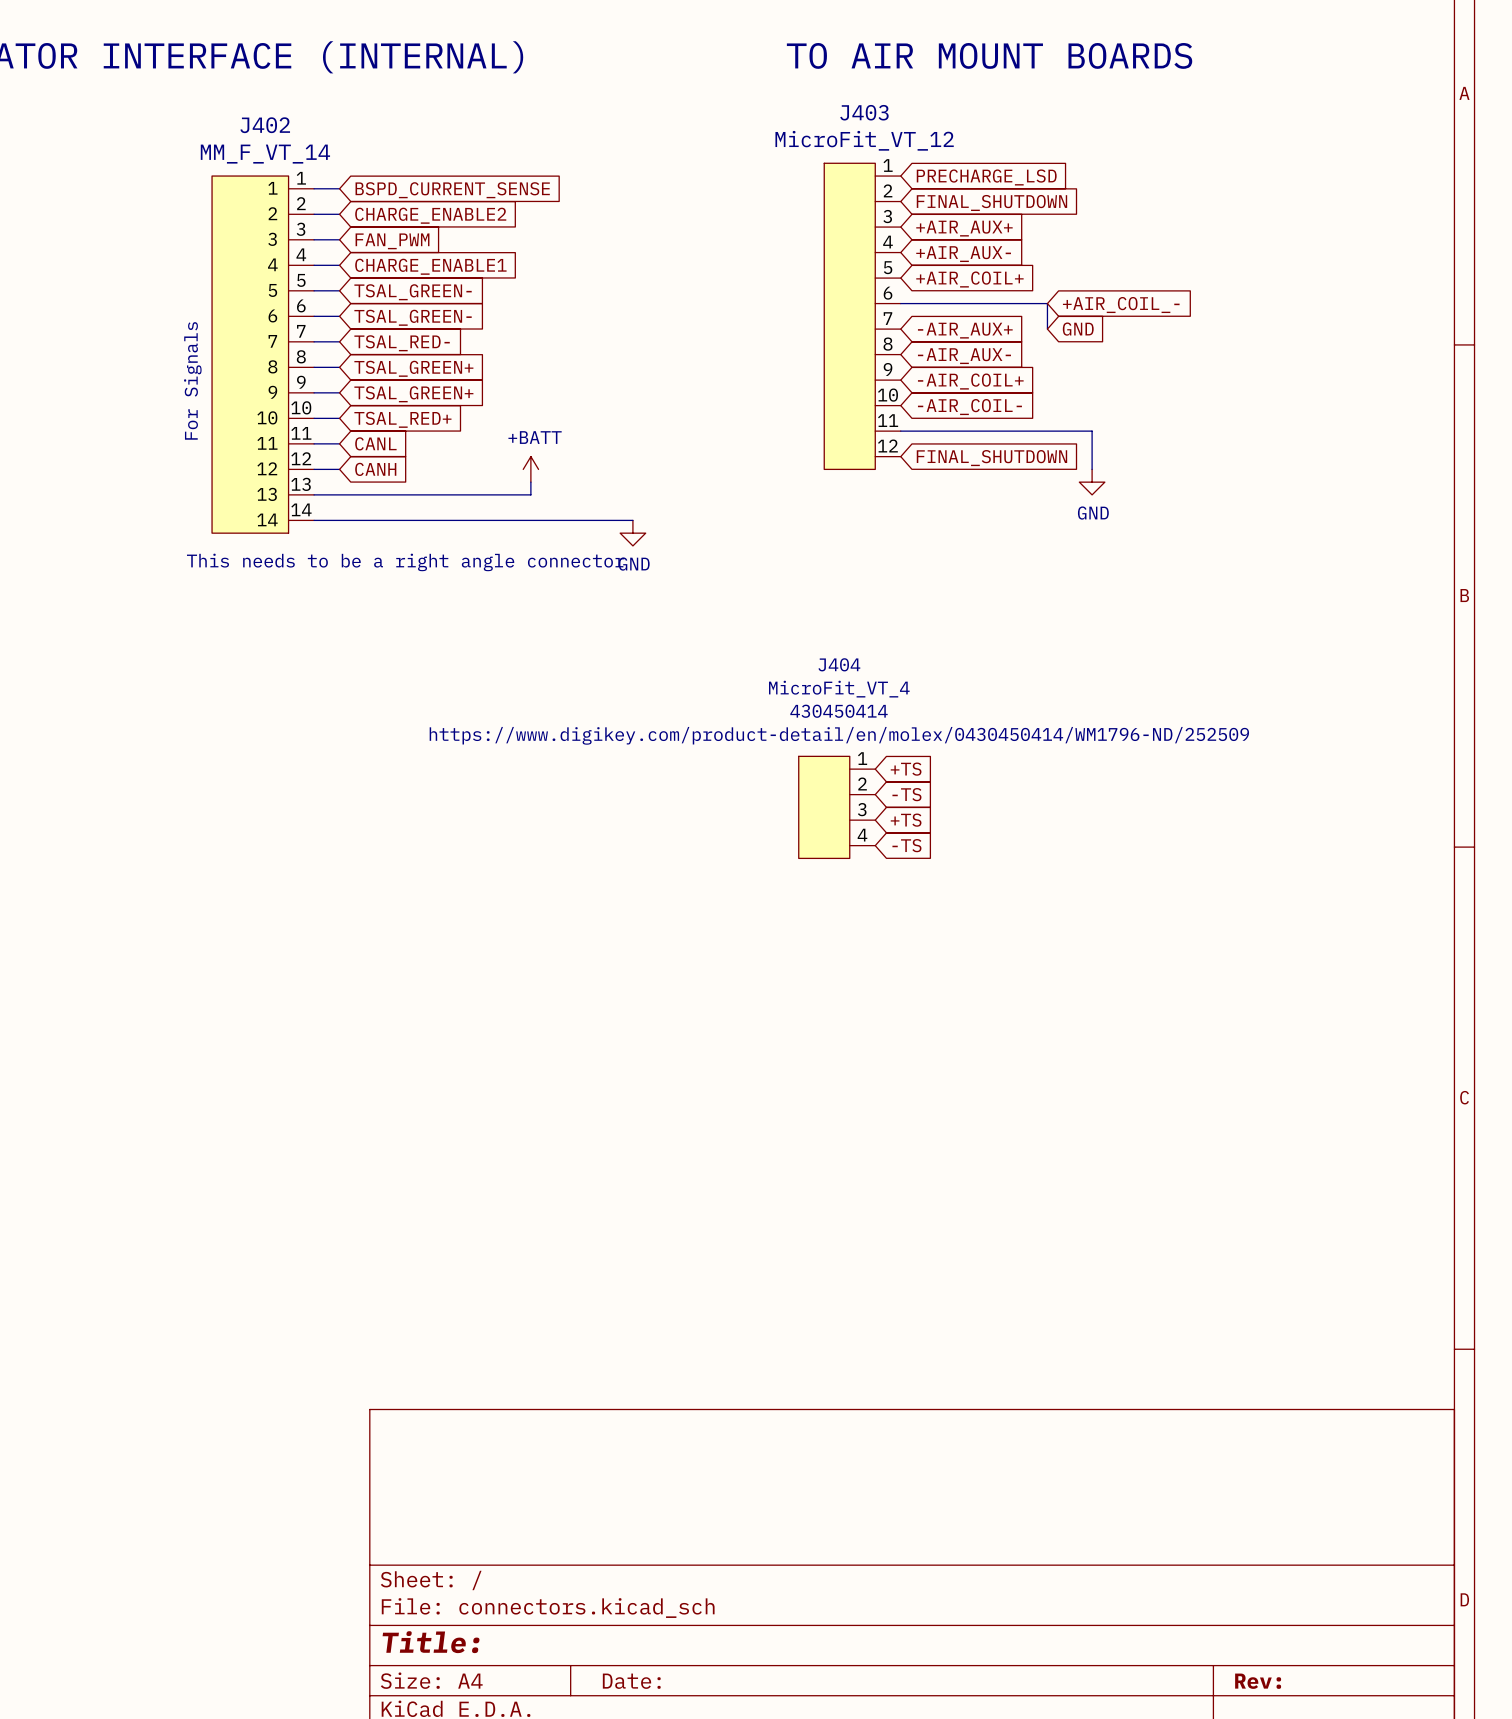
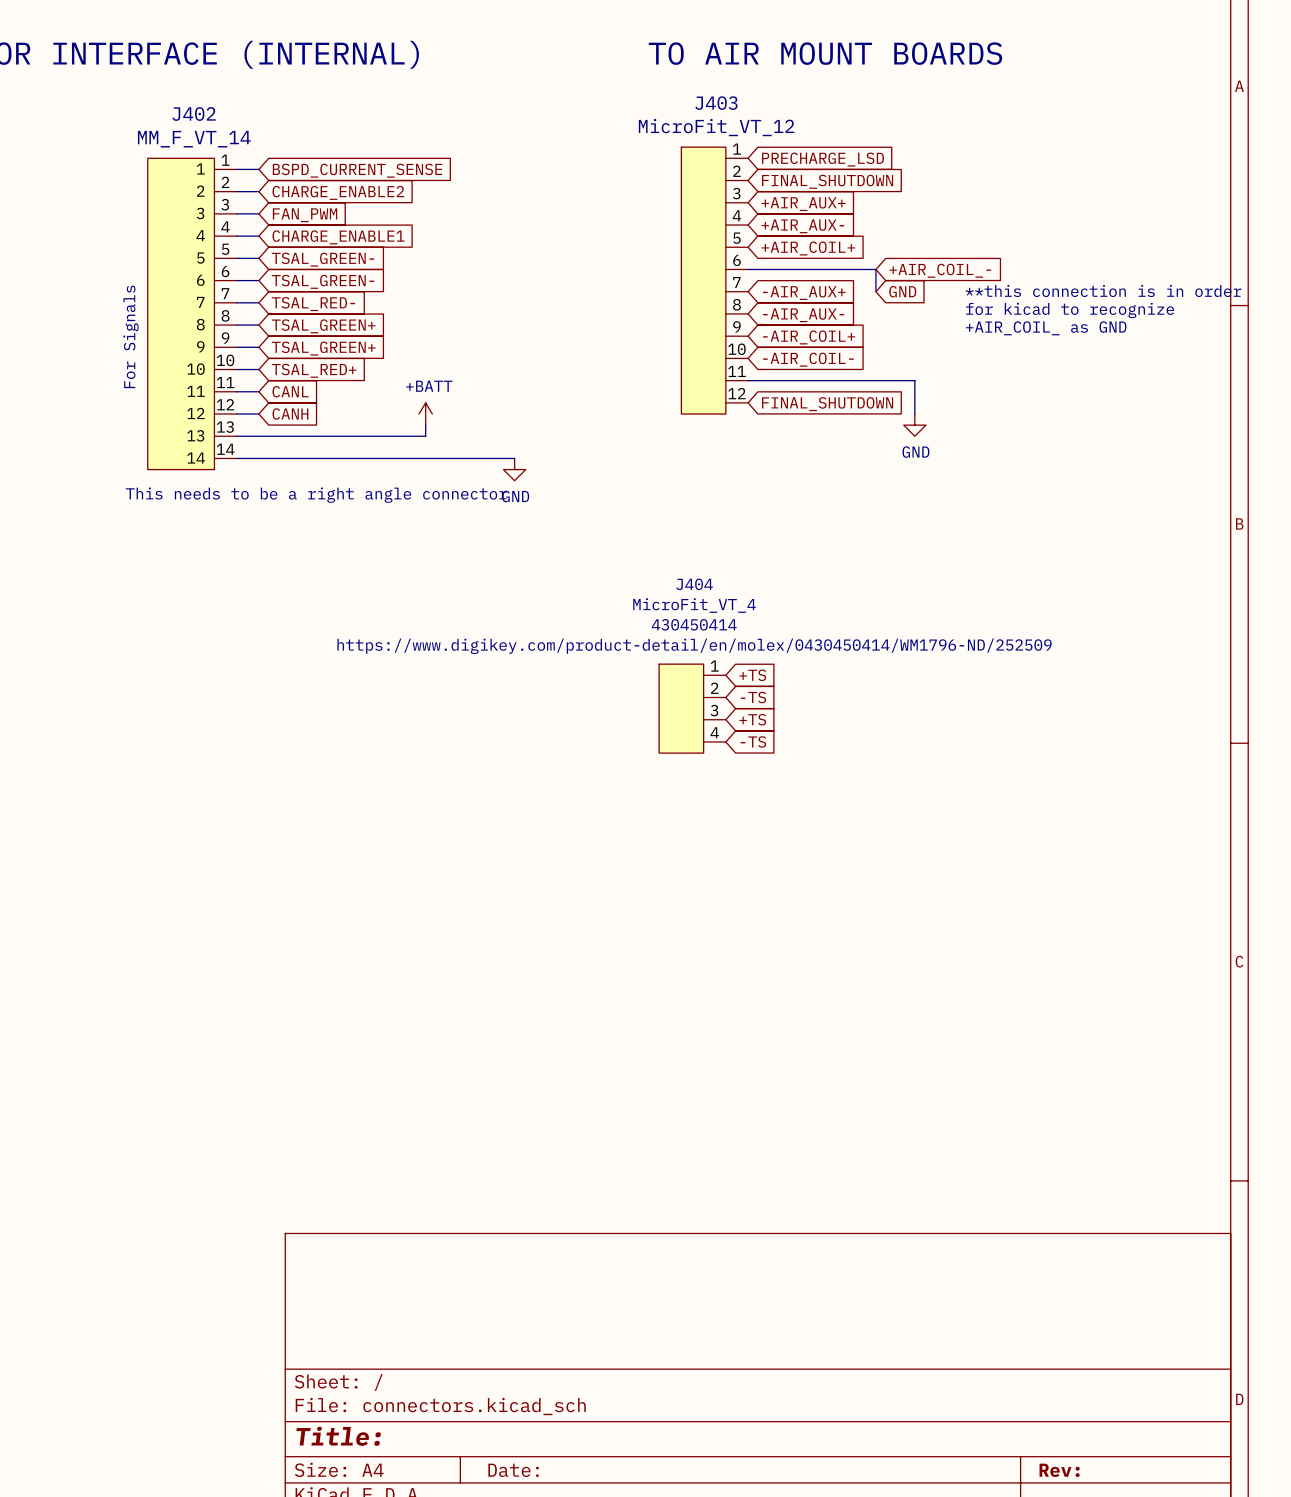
text: none -> **this connection is in order (1103, 290)
text: none -> for kicad to recognize (1070, 310)
text: none -> +AIR_COIL_ as GND (1046, 328)

